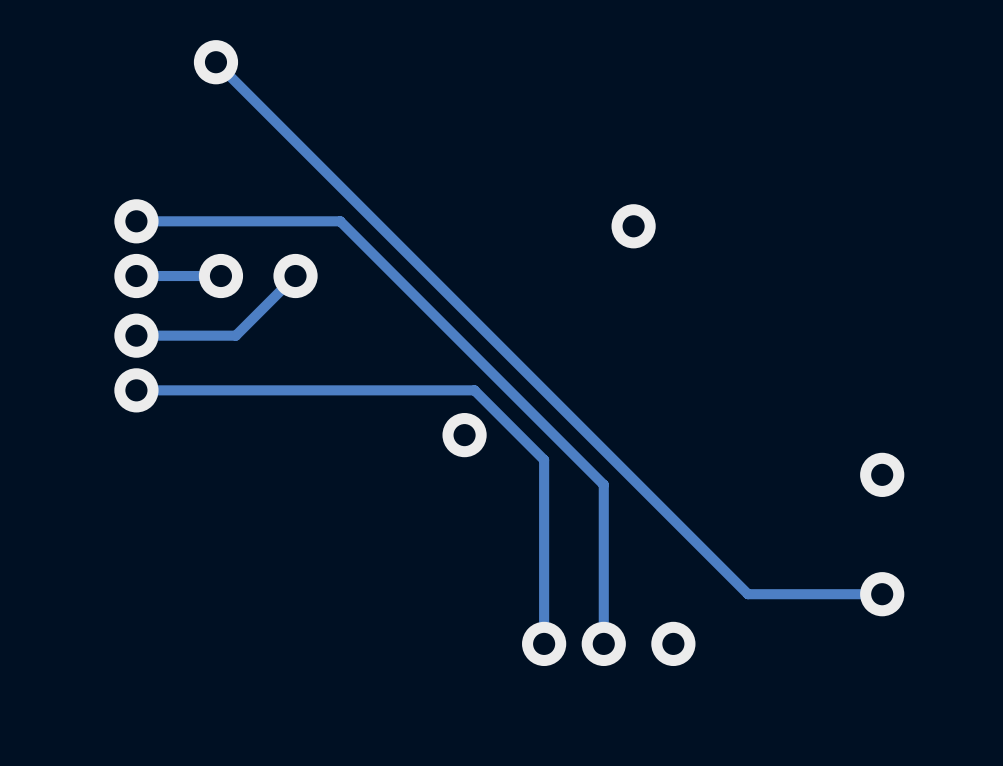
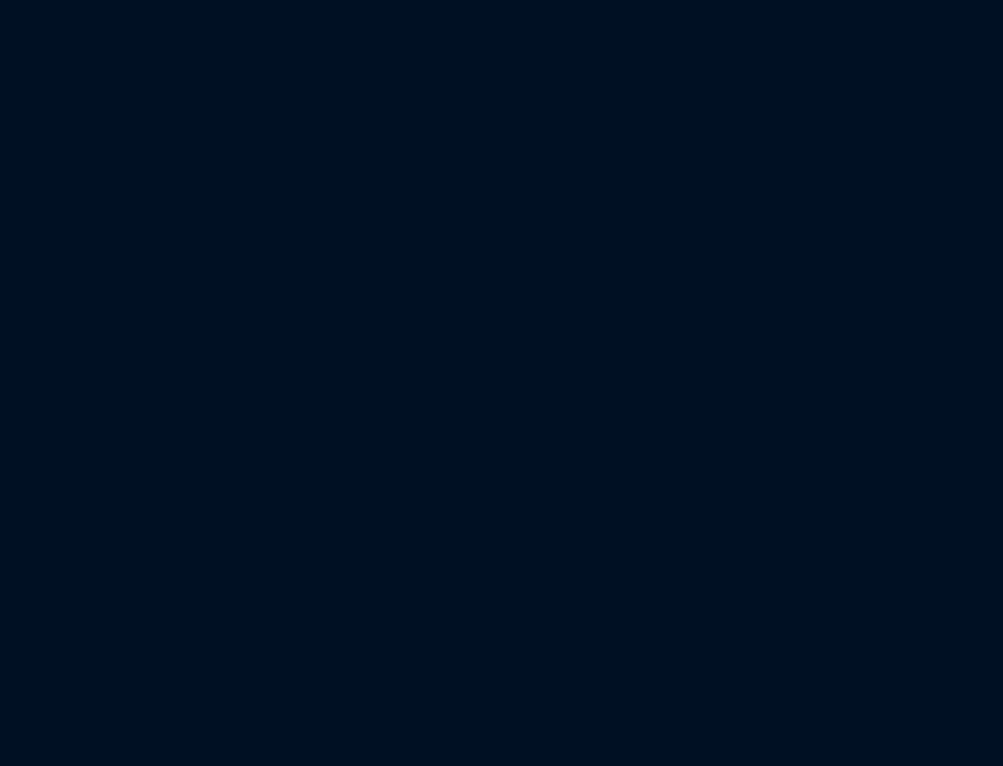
track: (215, 62) (747, 594) (882, 594) -> none
via: (215, 62) -> none
track: (136, 221) (340, 221) (603, 484) (603, 643) -> none
via: (136, 221) -> none
via: (633, 226) -> none
via: (136, 276) -> none
track: (220, 276) (136, 276) -> none
via: (220, 276) -> none
track: (295, 276) (235, 335) (136, 335) -> none
via: (295, 276) -> none
via: (136, 335) -> none
track: (136, 390) (474, 390) (544, 459) (544, 643) -> none
via: (136, 390) -> none
via: (464, 435) -> none
via: (882, 474) -> none
via: (882, 594) -> none
via: (544, 643) -> none
via: (603, 643) -> none
via: (673, 643) -> none

